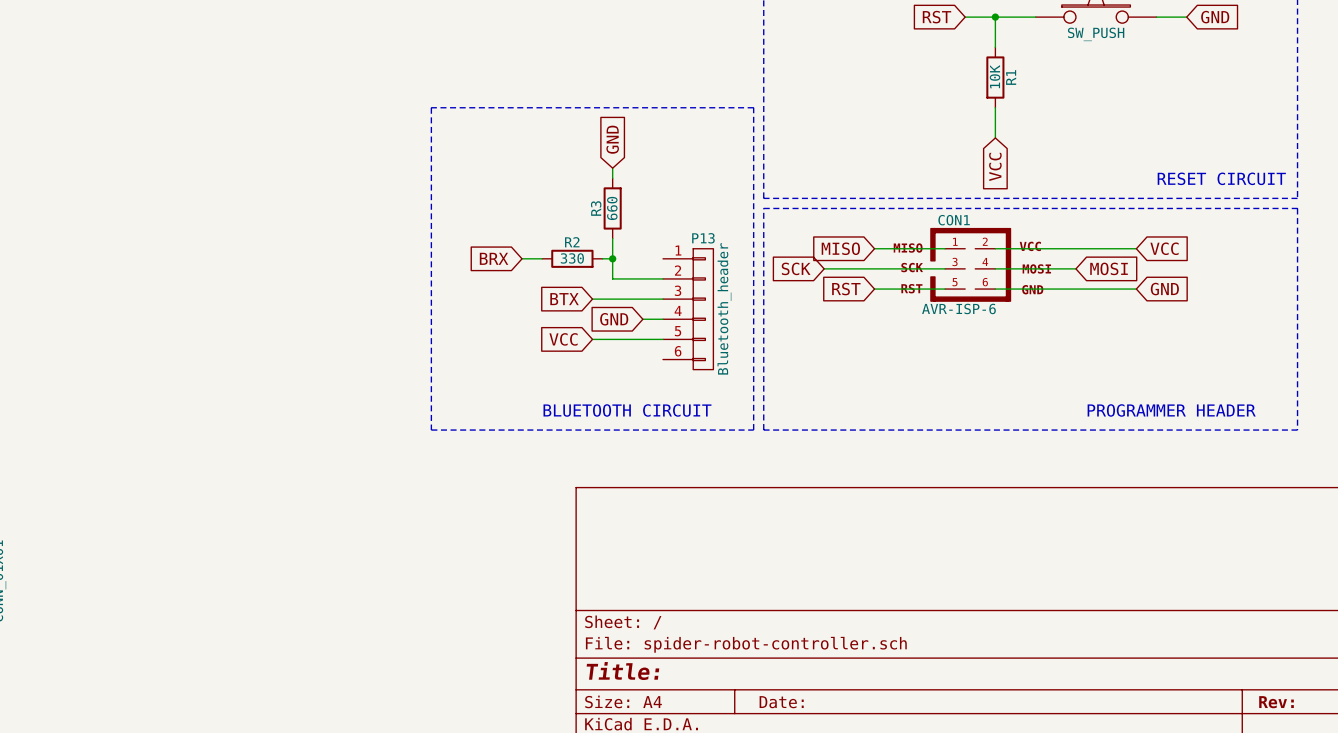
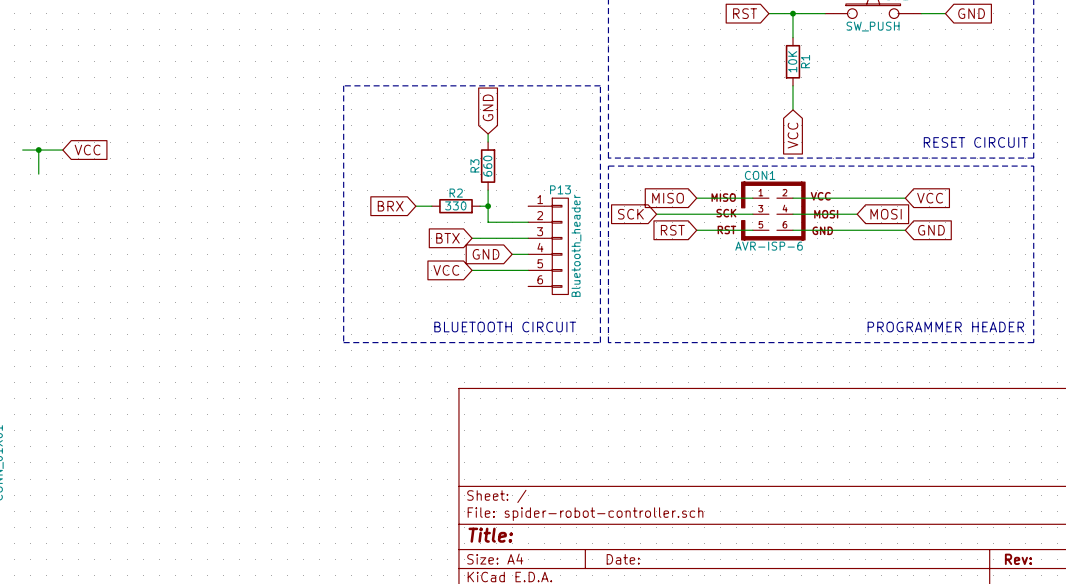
wire: none -> (22, 150) (62, 150)
wire: none -> (38, 150) (38, 174)
junction: none -> (38, 150)
global label: none -> VCC (87, 150)

